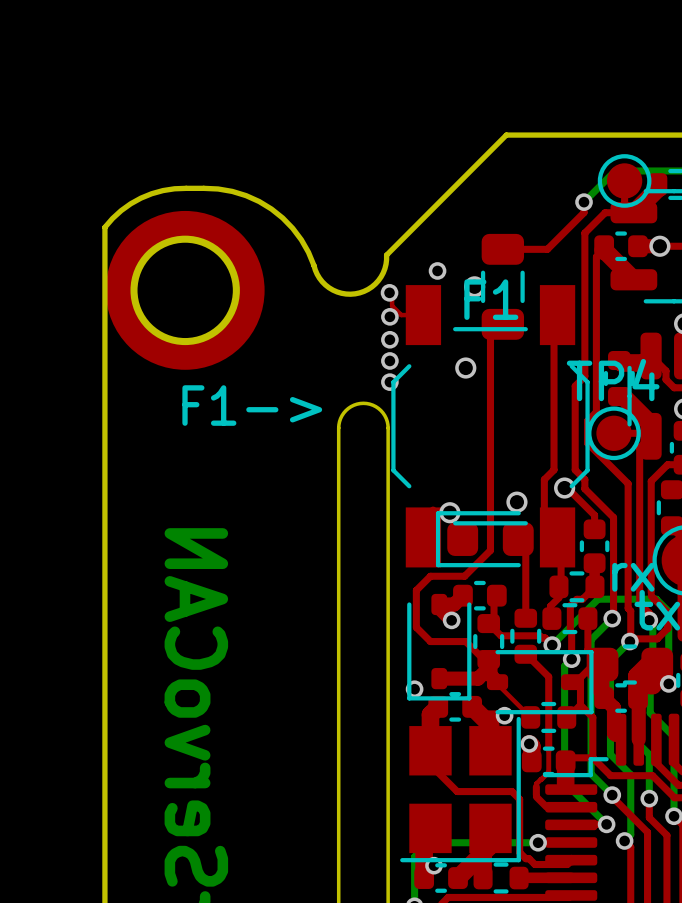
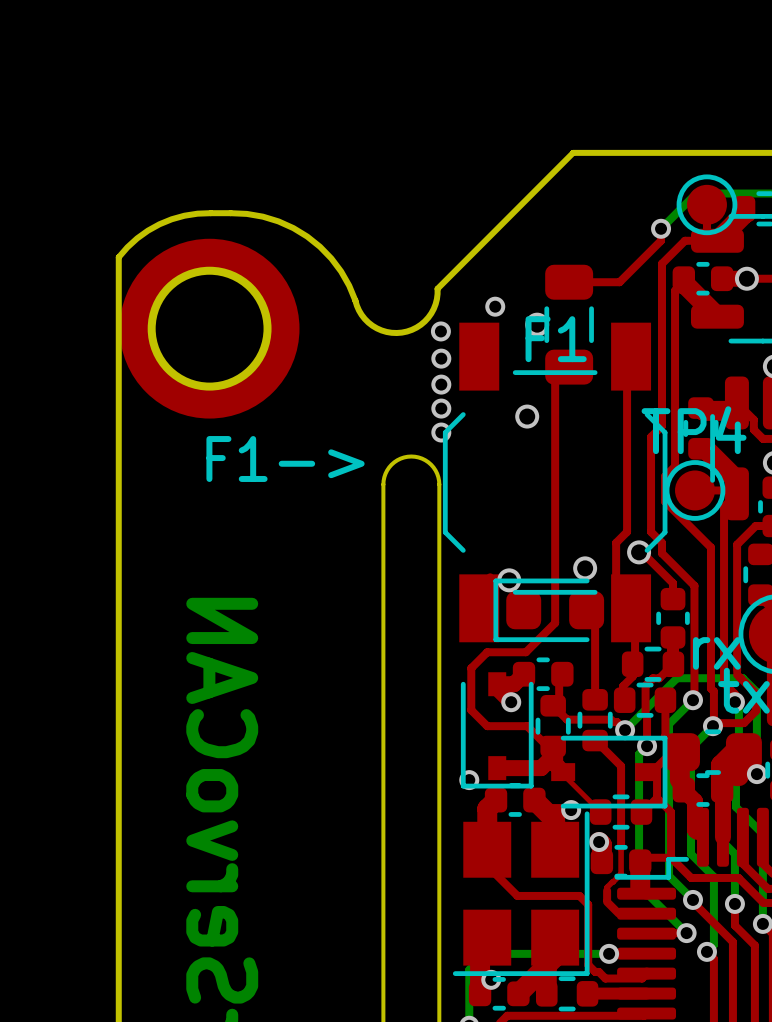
top track: (392, 295) (392, 305) (401, 315) (423, 315) -> none
part footprint: [407, 593, 472, 701] -> [460, 672, 534, 789]
part footprint: [486, 650, 594, 715] -> [551, 735, 668, 809]

